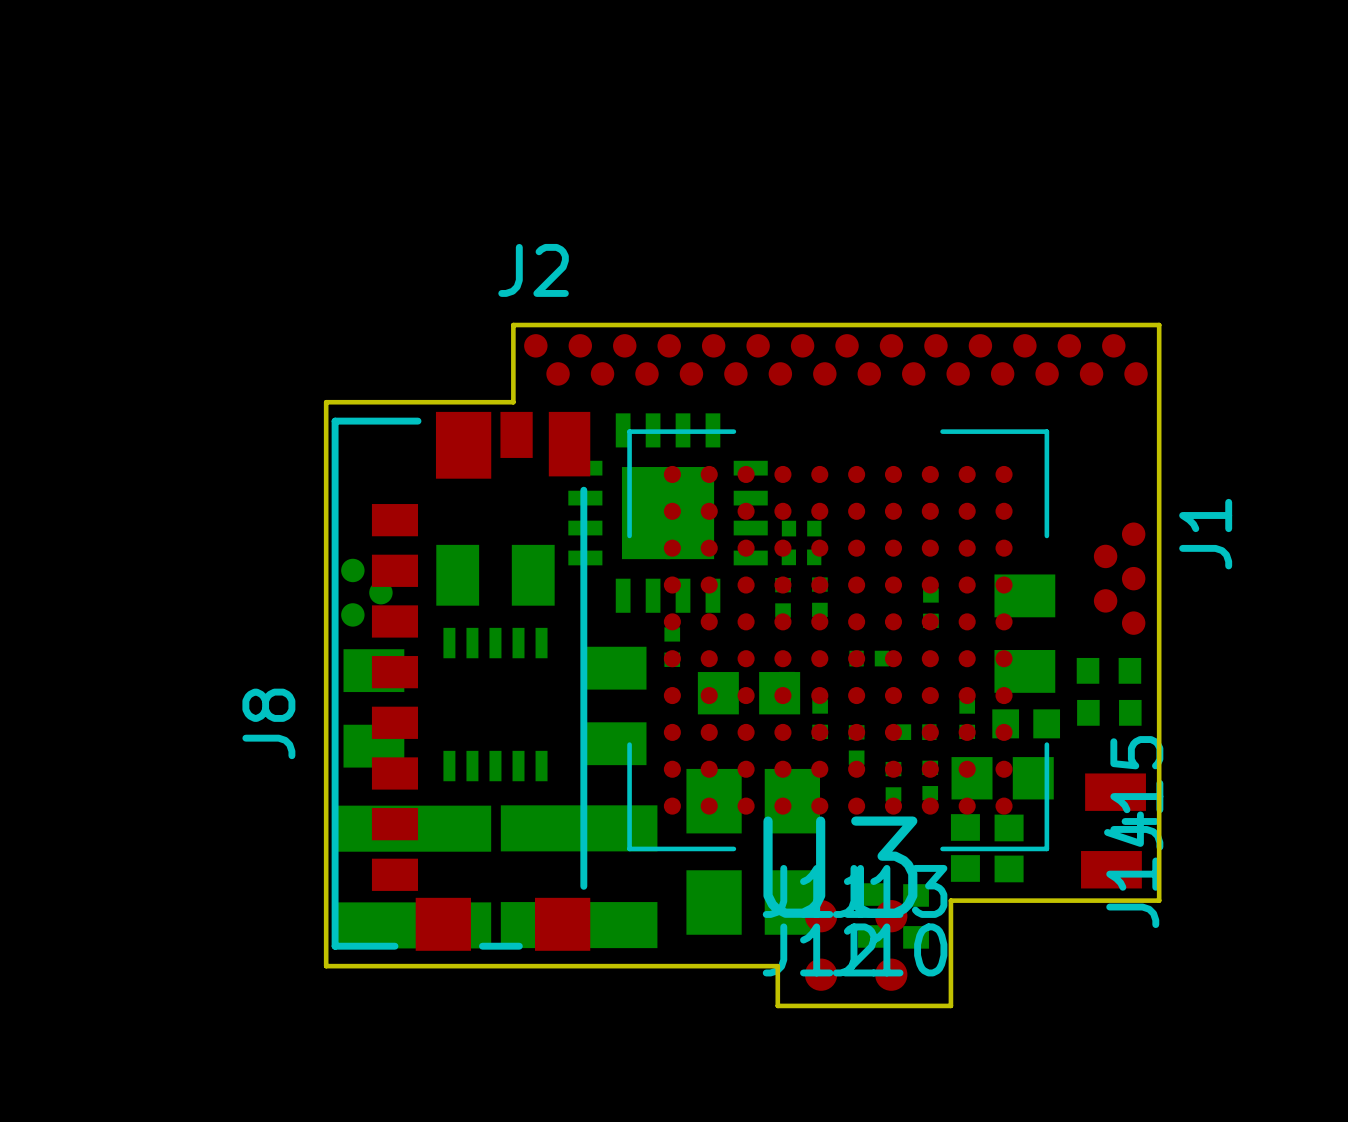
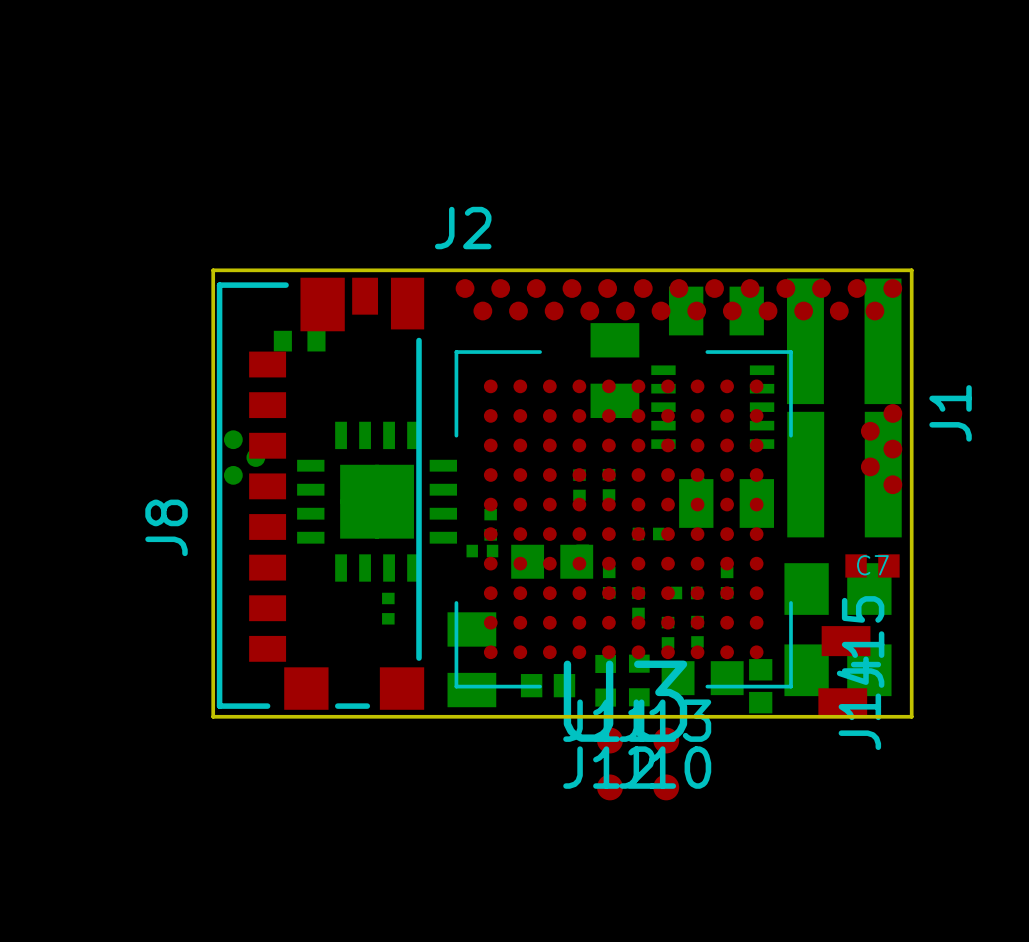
J2 footprint: [524, 334, 1148, 386] -> [455, 279, 903, 321]
part: none -> (716, 311)
board edge: (326, 402) (513, 402) (513, 325) (1159, 325) (1159, 900) (950, 900) (950, 1005) (777, 1005) (777, 966) (326, 966) (326, 886) -> (213, 328) (213, 270) (911, 270) (911, 716) (213, 716)
part: none -> (299, 341)
part: none -> (844, 341)
part: none -> (614, 370)
part position: (668, 513) -> (377, 501)
part: (801, 528) -> none
part: (801, 557) -> none
part: (495, 575) -> none
J1 position: (1119, 578) -> (881, 449)
part: none -> (844, 474)
part position: (366, 592) -> (244, 457)
part rotation: 0° (1024, 633) -> 90° clockwise (726, 503)
part: (1108, 670) -> none
part: none -> (482, 551)
J8 position: (460, 681) -> (320, 493)
C7: none -> (872, 565)
part rotation: 0° (495, 704) -> 90° clockwise (712, 407)
part position: (495, 704) -> (712, 407)
part position: (616, 705) -> (471, 659)
part: (373, 708) -> none
part: (1109, 712) -> none
part: (1026, 723) -> none
part: none -> (388, 608)
part footprint: [686, 768, 821, 935] -> [520, 674, 576, 698]
part: none -> (837, 629)
part: (1002, 778) -> none
part footprint: [950, 814, 980, 882] -> [661, 661, 744, 696]
part: none -> (605, 680)
part: none -> (639, 680)
part: (579, 876) -> none
part: (412, 877) -> none
part: (870, 915) -> none
part: (916, 916) -> none

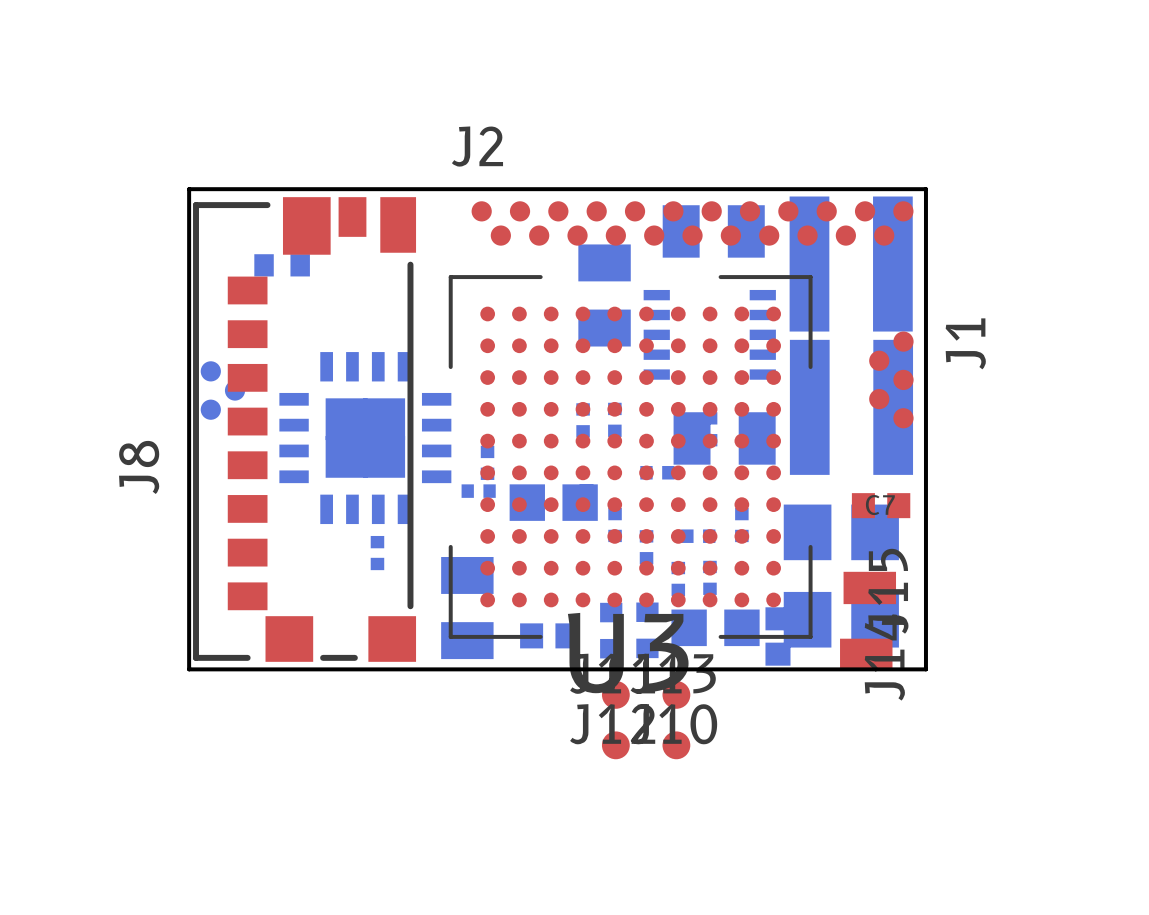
J2 name position: J2 (463, 228) -> J2 (477, 146)
board edge: (898, 270) (911, 270) (911, 716) (898, 716) -> (925, 189) (925, 669)
J2 footprint: [455, 279, 903, 321] -> [471, 201, 914, 246]
part position: (716, 311) -> (713, 231)
part position: (844, 341) -> (851, 264)
part position: (614, 370) -> (604, 295)
part position: (712, 407) -> (709, 334)
J1 position: (881, 449) -> (891, 379)
part position: (844, 474) -> (851, 407)
part position: (726, 503) -> (724, 438)
C7 position: (872, 565) -> (881, 505)
part position: (837, 629) -> (841, 576)

